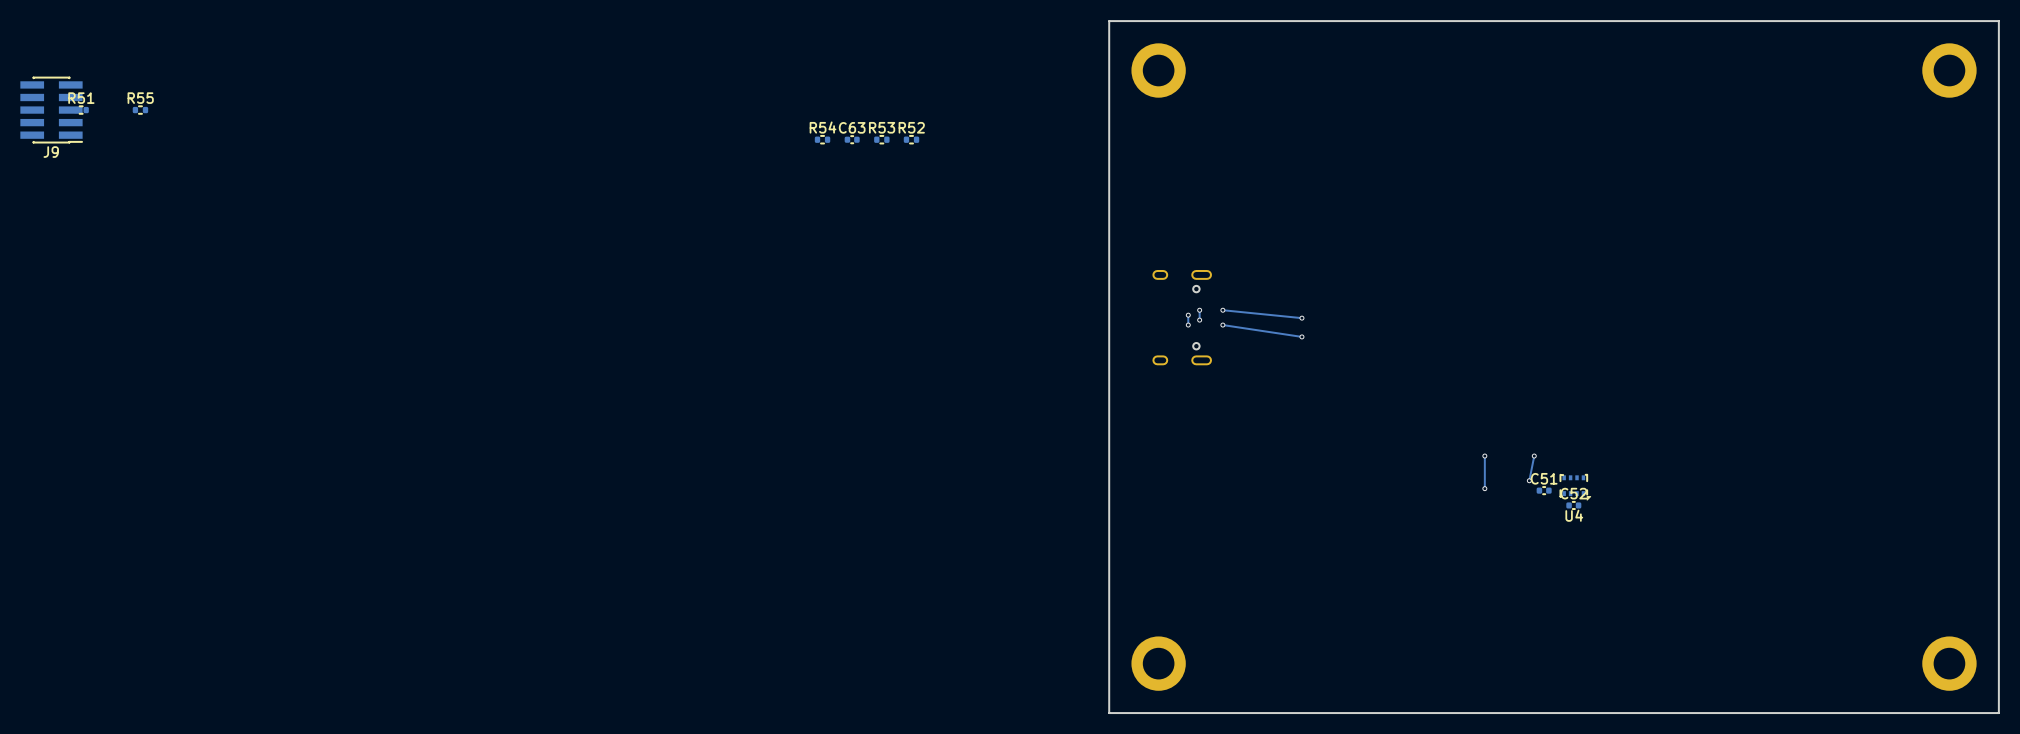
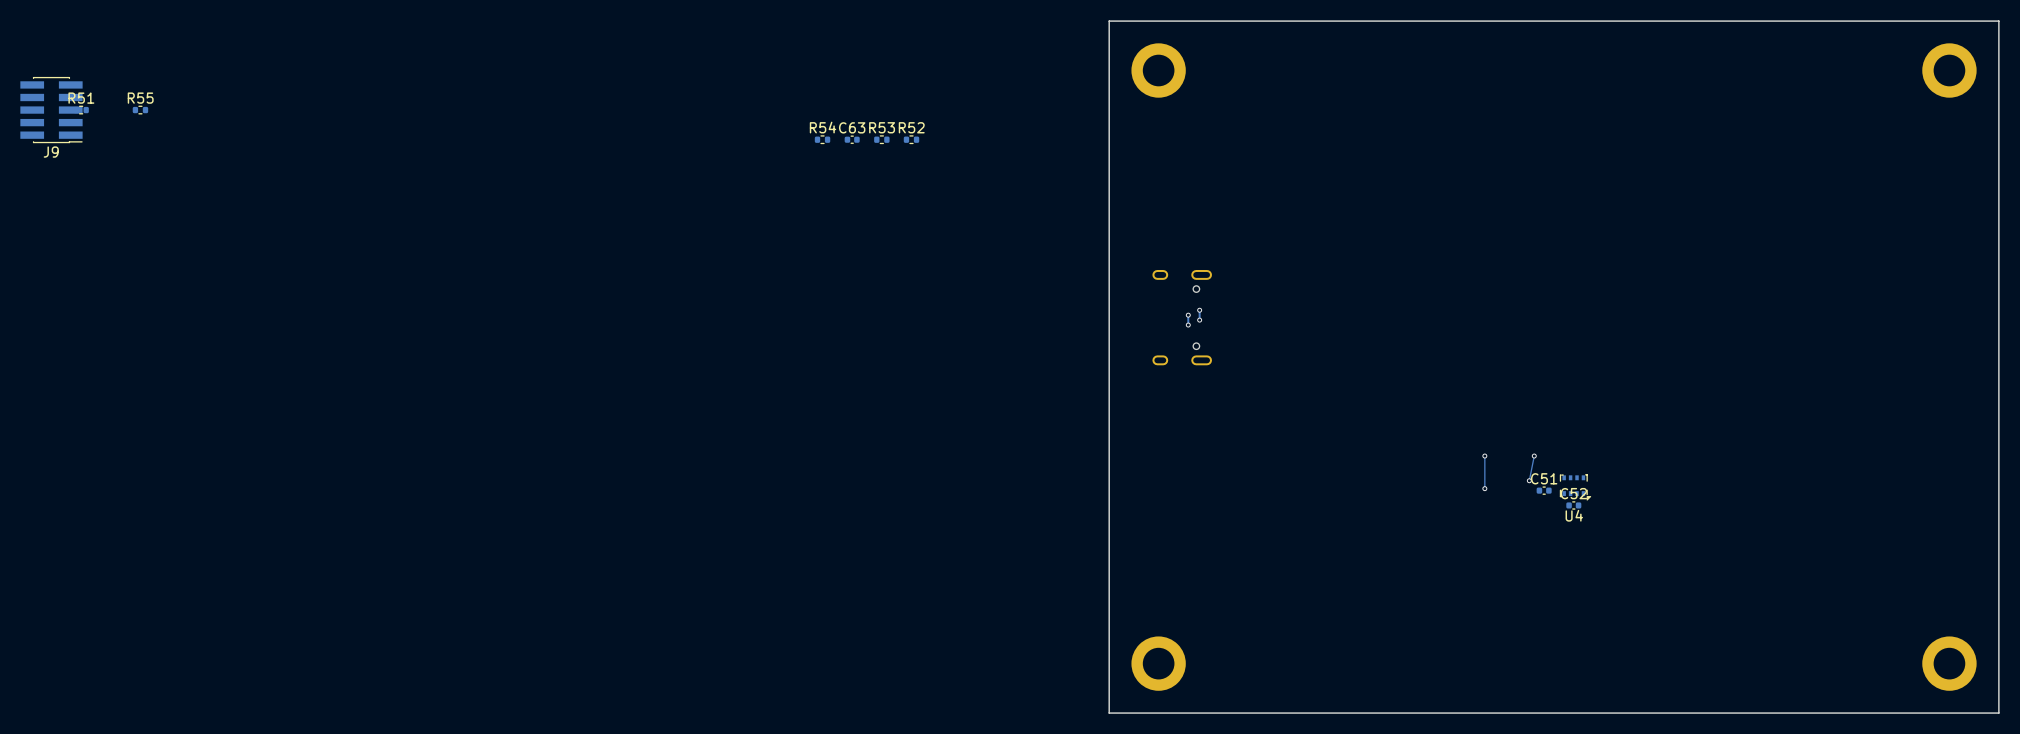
track: (1222, 310) (1301, 318) -> none
via: (1222, 310) -> none
via: (1301, 318) -> none
track: (1222, 325) (1301, 336) -> none
via: (1222, 325) -> none
via: (1301, 336) -> none

